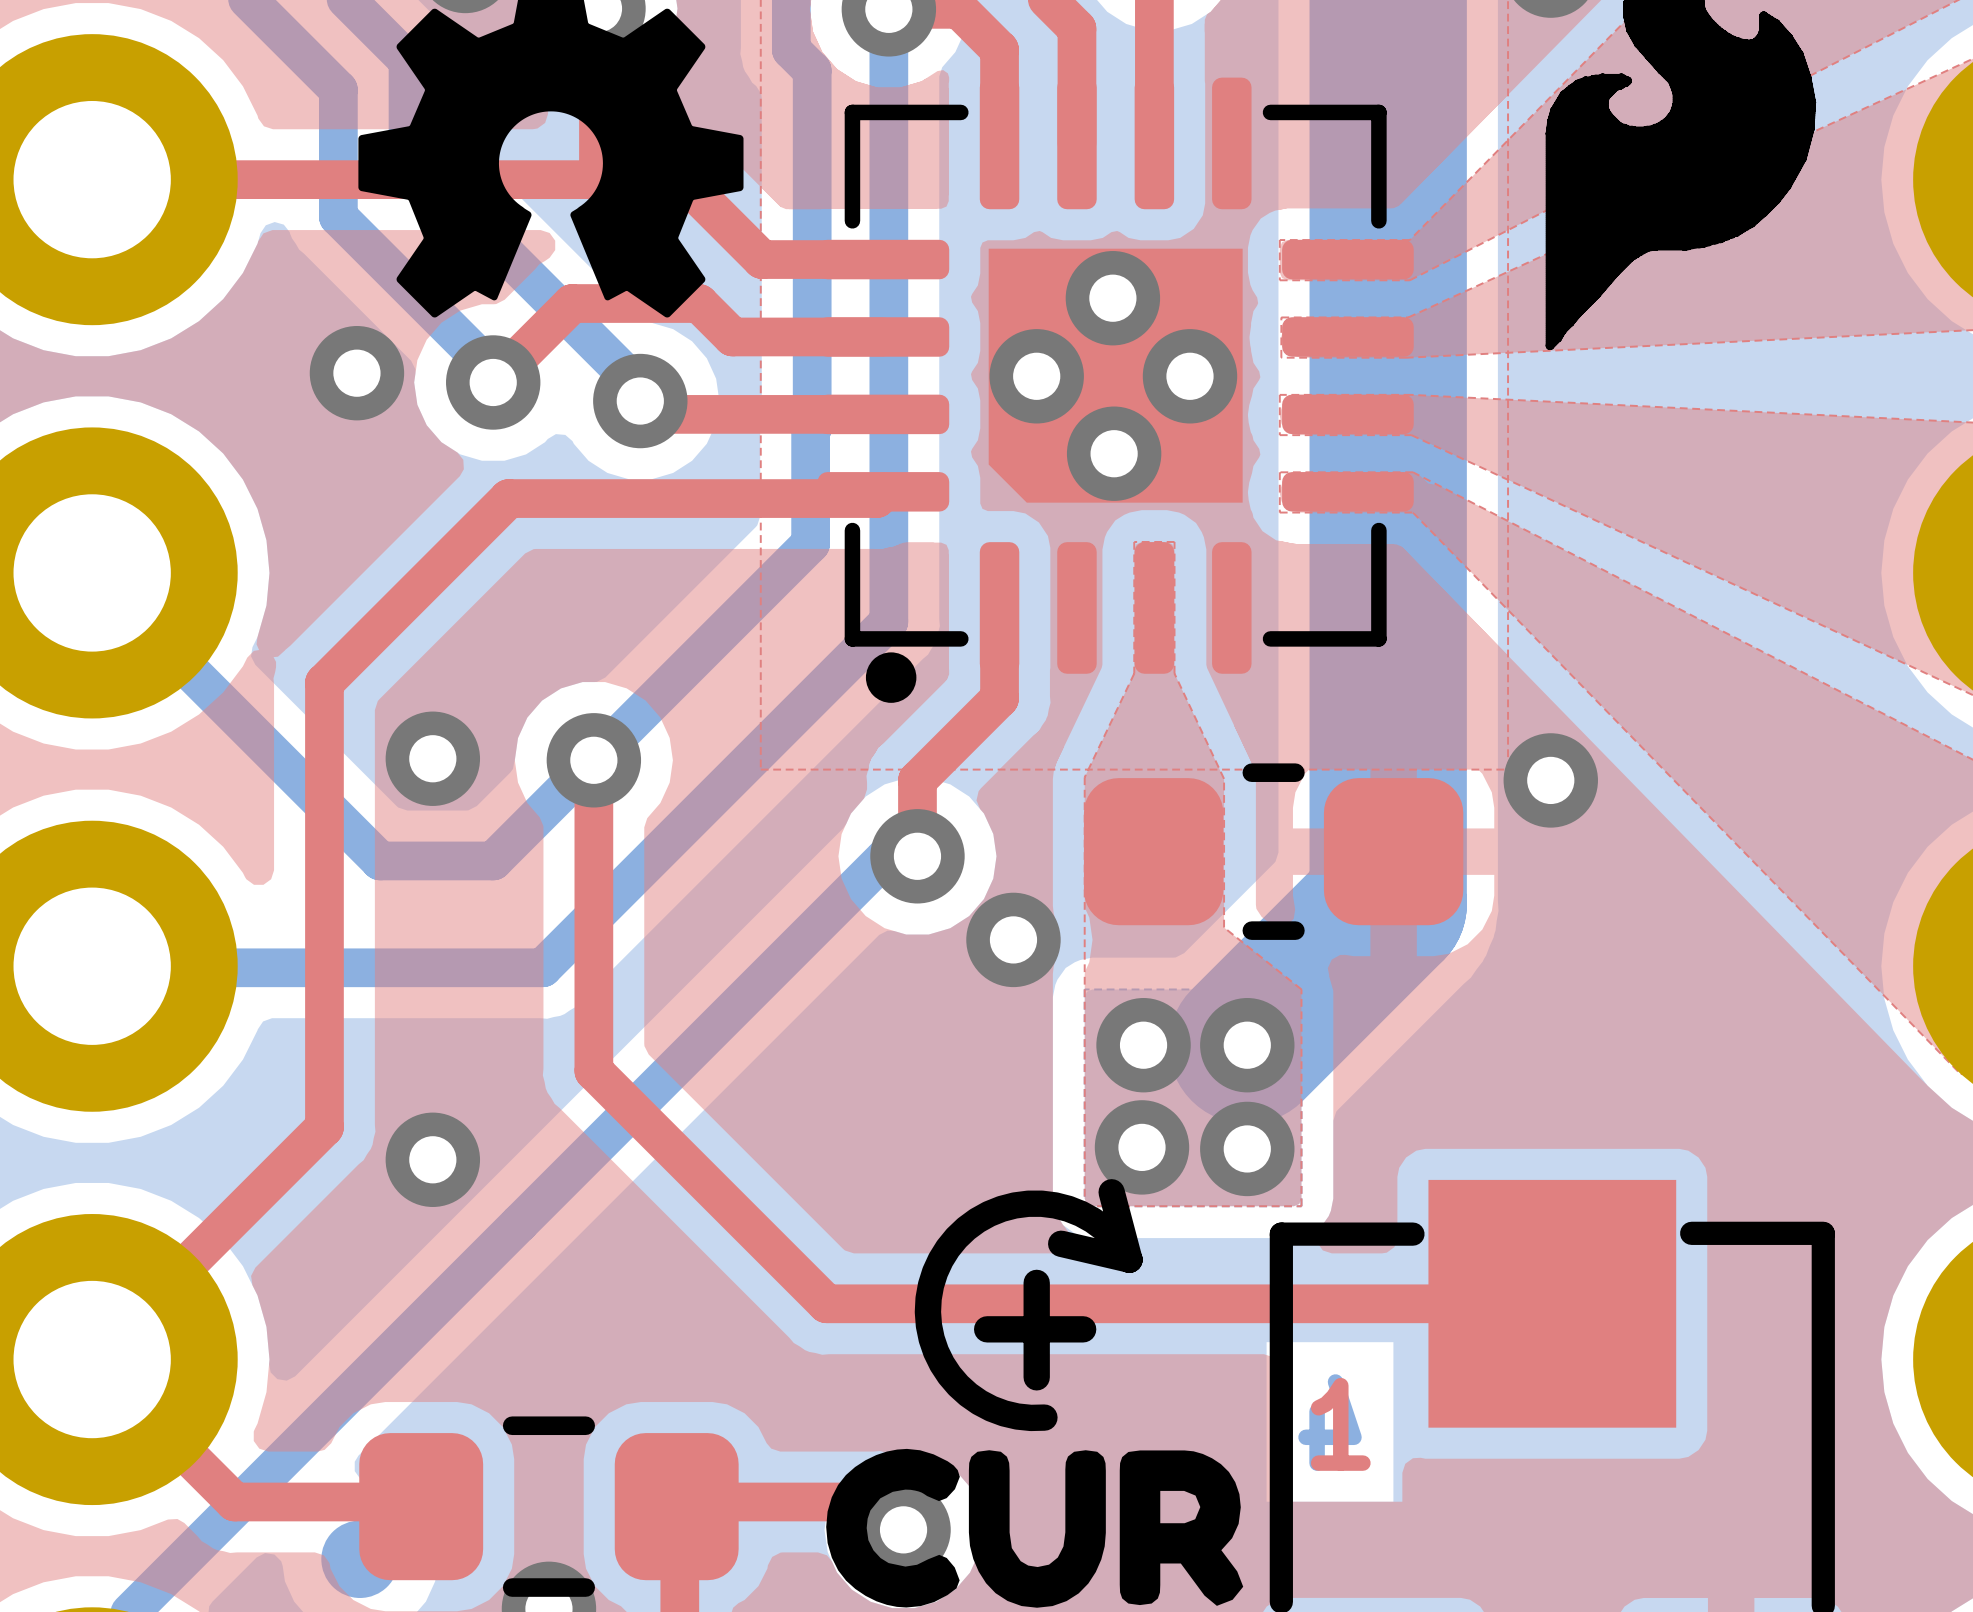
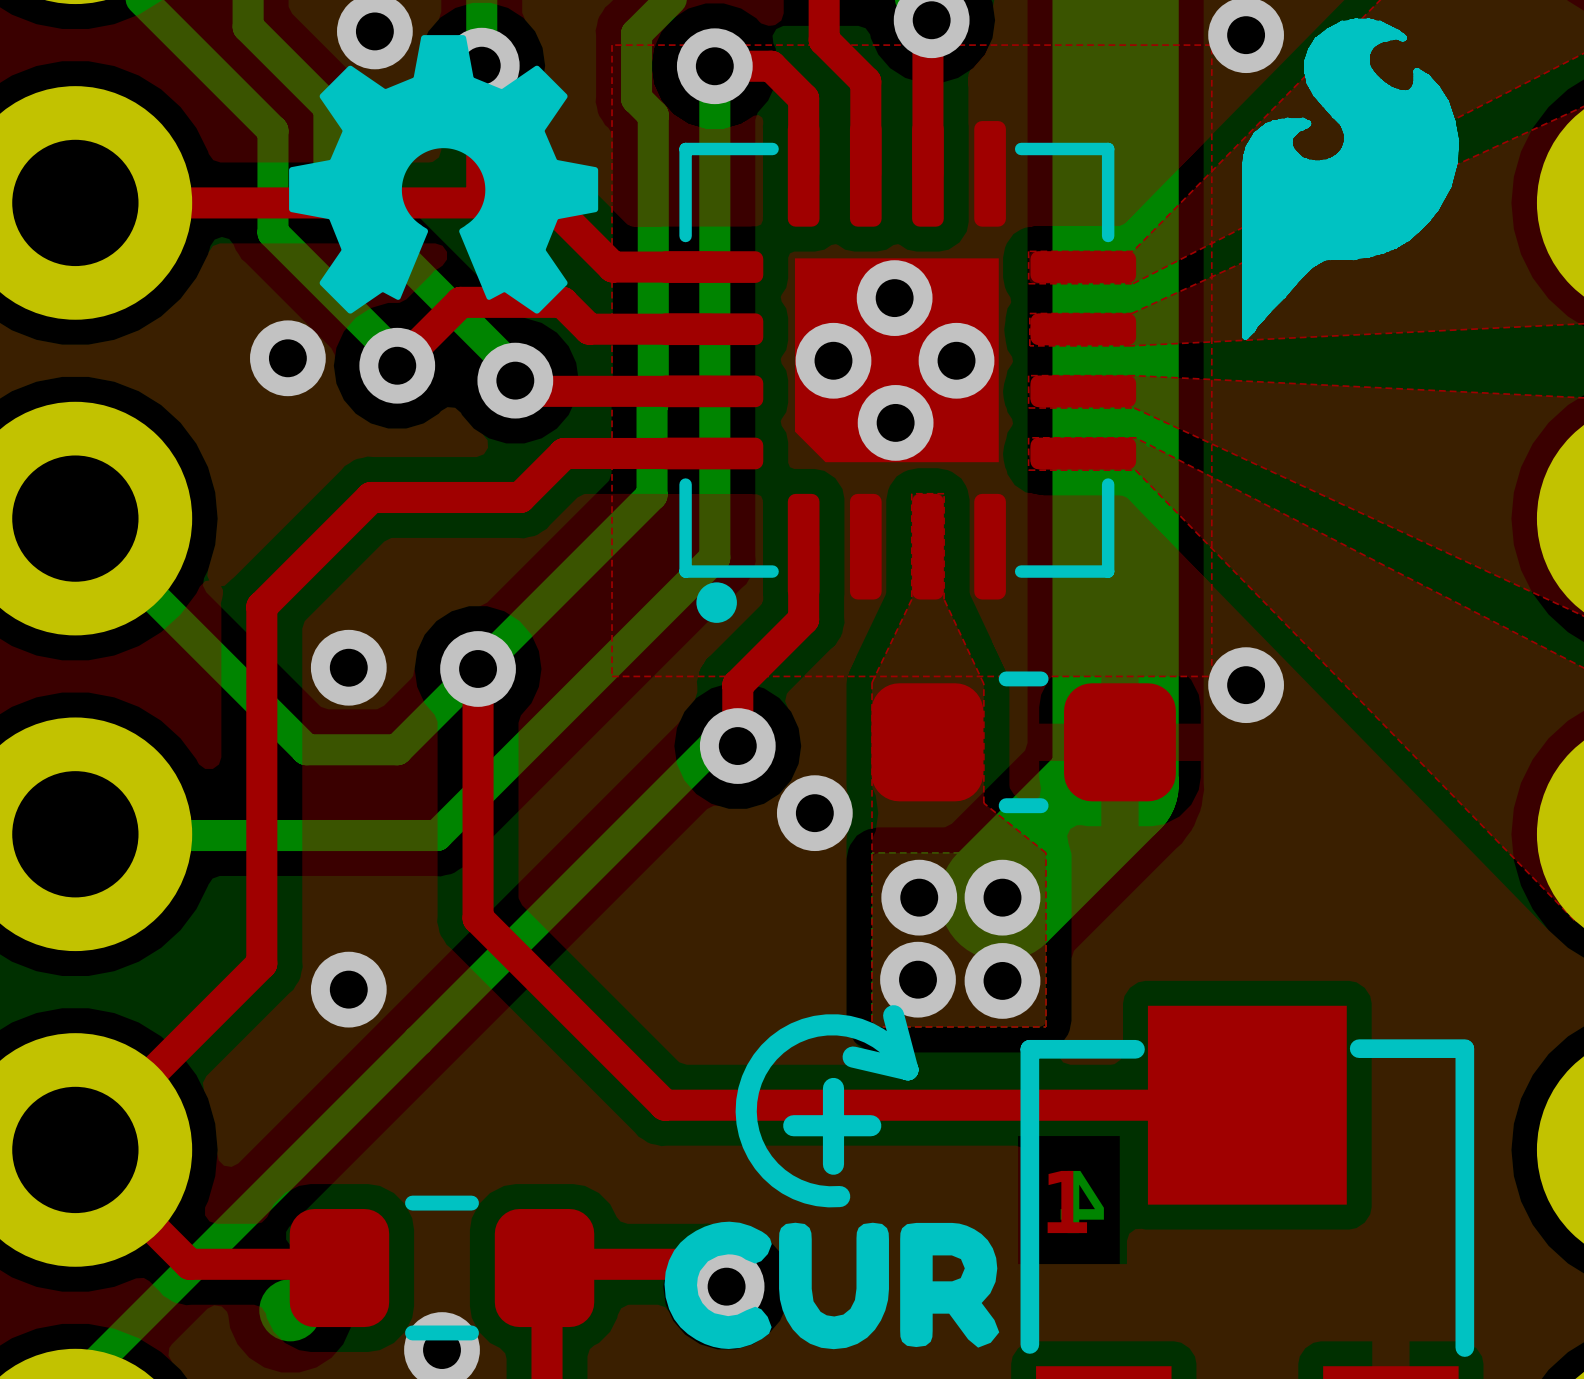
top track: (883, 491) (876, 498) (508, 498) (460, 546) -> (710, 453) (564, 453) (520, 497) (371, 497)

